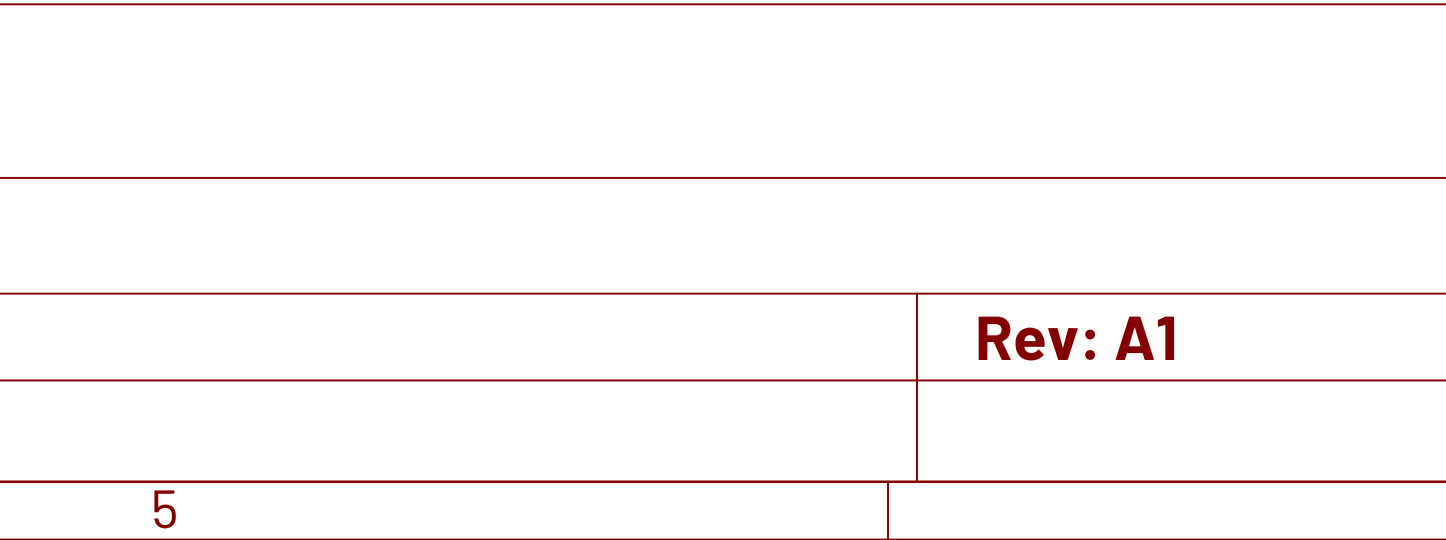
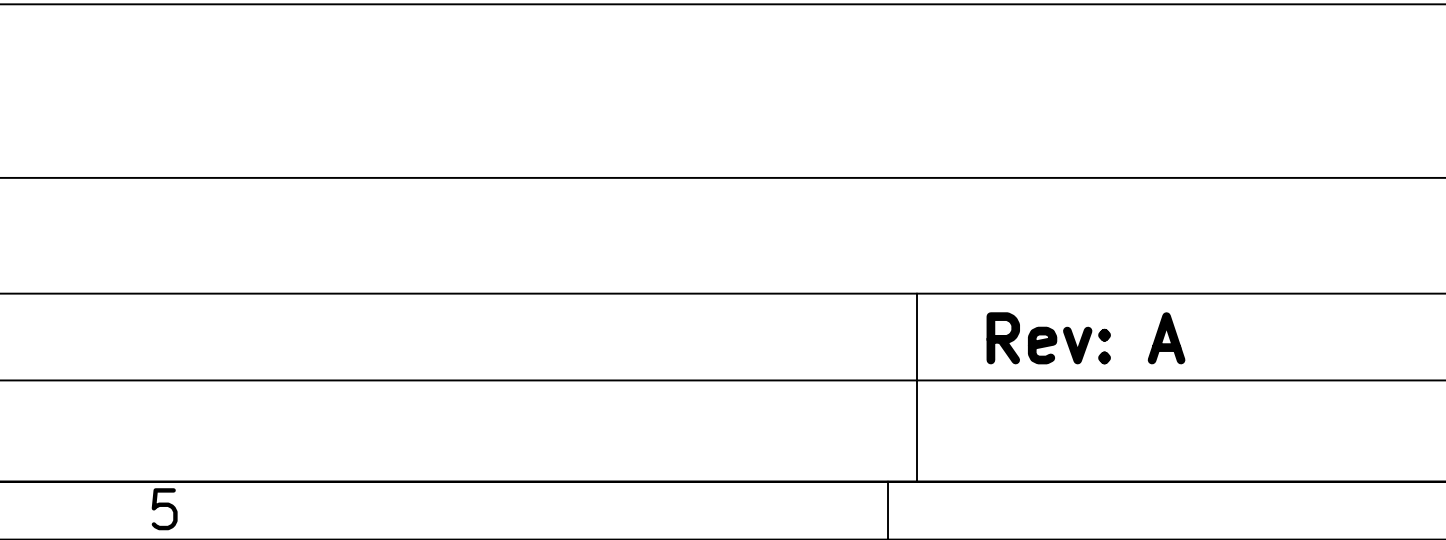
title block: Rev: A1 (1076, 338) -> Rev: A (1085, 338)

